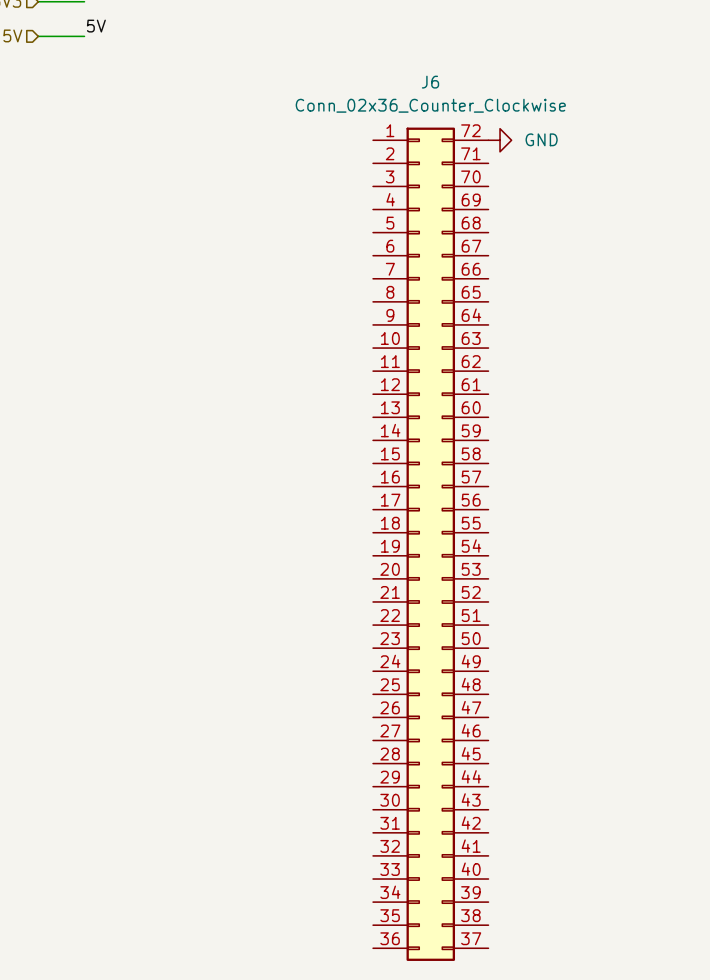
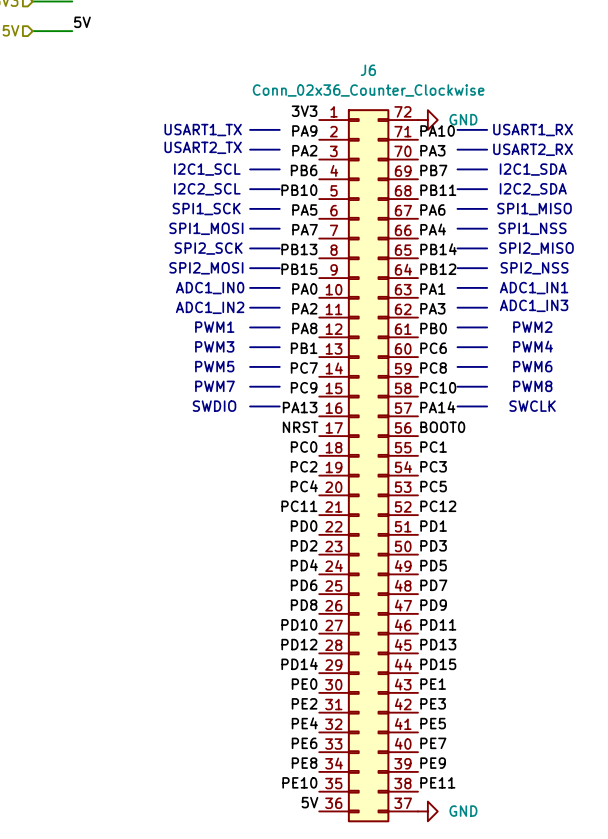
label: none -> 3V3 (304, 111)
text: none -> USART1_TX (203, 130)
line: none -> (250, 129) (279, 129)
line: none -> (457, 129) (487, 129)
text: none -> USART1_RX (533, 130)
label: none -> PA9 (304, 130)
label: none -> PA10 (437, 130)
text: none -> USART2_TX (203, 147)
line: none -> (250, 149) (279, 149)
line: none -> (457, 149) (487, 149)
text: none -> USART2_RX (533, 149)
label: none -> PA2 (304, 150)
label: none -> PA3 (432, 150)
line: none -> (250, 169) (279, 169)
line: none -> (457, 169) (487, 169)
text: none -> I2C1_SCL (207, 169)
text: none -> I2C1_SDA (533, 169)
label: none -> PB6 (304, 170)
label: none -> PB7 (433, 170)
text: none -> I2C2_SCL (207, 189)
line: none -> (250, 189) (279, 189)
line: none -> (457, 189) (487, 189)
text: none -> I2C2_SDA (533, 189)
label: none -> PB10 (299, 190)
label: none -> PB11 (438, 190)
text: none -> SPI1_SCK (206, 209)
line: none -> (250, 208) (279, 208)
line: none -> (457, 208) (487, 208)
text: none -> SPI1_MISO (534, 209)
label: none -> PA5 (304, 209)
label: none -> PA6 (432, 209)
text: none -> SPI1_MOSI (206, 228)
line: none -> (250, 228) (279, 228)
line: none -> (457, 228) (487, 228)
text: none -> SPI1_NSS (532, 228)
label: none -> PA7 (305, 229)
label: none -> PA4 (433, 229)
text: none -> SPI2_SCK (208, 248)
line: none -> (250, 248) (279, 248)
line: none -> (457, 248) (487, 248)
text: none -> SPI2_MISO (536, 248)
label: none -> PB13 (299, 249)
label: none -> PB14 (438, 249)
text: none -> SPI2_MOSI (206, 268)
line: none -> (250, 268) (279, 268)
line: none -> (457, 268) (487, 268)
text: none -> SPI2_NSS (534, 268)
label: none -> PB15 (299, 269)
label: none -> PB12 (438, 269)
text: none -> ADC1_IN0 (210, 288)
line: none -> (250, 287) (279, 287)
line: none -> (457, 287) (487, 287)
text: none -> ADC1_IN1 (534, 288)
label: none -> PA0 (304, 289)
label: none -> PA1 (432, 289)
text: none -> ADC1_IN3 (534, 305)
text: none -> ADC1_IN2 (210, 307)
line: none -> (250, 307) (279, 307)
line: none -> (457, 307) (487, 307)
label: none -> PA2 (304, 308)
label: none -> PA3 (432, 308)
text: none -> PWM1 (214, 327)
line: none -> (250, 327) (279, 327)
line: none -> (457, 327) (487, 327)
text: none -> PWM2 (532, 327)
label: none -> PA8 (304, 328)
label: none -> PB0 (433, 328)
text: none -> PWM3 (214, 346)
line: none -> (250, 347) (279, 347)
line: none -> (457, 347) (487, 347)
text: none -> PWM4 (533, 346)
label: none -> PB1 (304, 348)
label: none -> PC6 (433, 348)
text: none -> PWM5 (214, 366)
line: none -> (250, 366) (279, 366)
line: none -> (457, 366) (487, 366)
text: none -> PWM6 (532, 366)
label: none -> PC7 (304, 368)
label: none -> PC8 (433, 368)
text: none -> PWM7 (214, 386)
line: none -> (250, 386) (279, 386)
line: none -> (457, 386) (487, 386)
text: none -> PWM8 (532, 386)
label: none -> PC9 (304, 387)
label: none -> PC10 (438, 387)
text: none -> SWDIO (214, 406)
text: none -> SWCLK (532, 406)
line: none -> (250, 406) (279, 406)
label: none -> PA14 (437, 407)
line: none -> (457, 406) (487, 406)
label: none -> PA13 (300, 407)
label: none -> NRST (300, 427)
label: none -> BOOT0 (442, 427)
label: none -> PC0 (304, 447)
label: none -> PC1 (433, 447)
label: none -> PC2 (304, 466)
label: none -> PC3 (433, 466)
label: none -> PC4 (304, 486)
label: none -> PC5 (433, 486)
label: none -> PC11 (299, 506)
label: none -> PC12 (438, 506)
label: none -> PD0 (304, 526)
label: none -> PD1 (433, 526)
label: none -> PD2 (304, 545)
label: none -> PD3 (433, 545)
label: none -> PD4 (304, 565)
label: none -> PD5 (433, 565)
label: none -> PD6 (304, 585)
label: none -> PD7 (433, 585)
label: none -> PD8 (304, 605)
label: none -> PD9 (433, 605)
label: none -> PD10 (299, 624)
label: none -> PD11 (438, 624)
label: none -> PD12 (299, 644)
label: none -> PD13 (438, 644)
label: none -> PD14 (299, 664)
label: none -> PD15 (438, 664)
label: none -> PE0 (304, 684)
label: none -> PE1 (433, 684)
label: none -> PE2 (304, 703)
label: none -> PE3 (433, 703)
label: none -> PE4 (304, 723)
label: none -> PE5 (433, 723)
label: none -> PE6 (304, 743)
label: none -> PE7 (433, 743)
label: none -> PE8 (304, 763)
label: none -> PE9 (433, 763)
label: none -> PE10 (299, 782)
label: none -> PE11 (437, 782)
label: none -> 5V (309, 802)
power symbol: none -> GND (427, 811)

